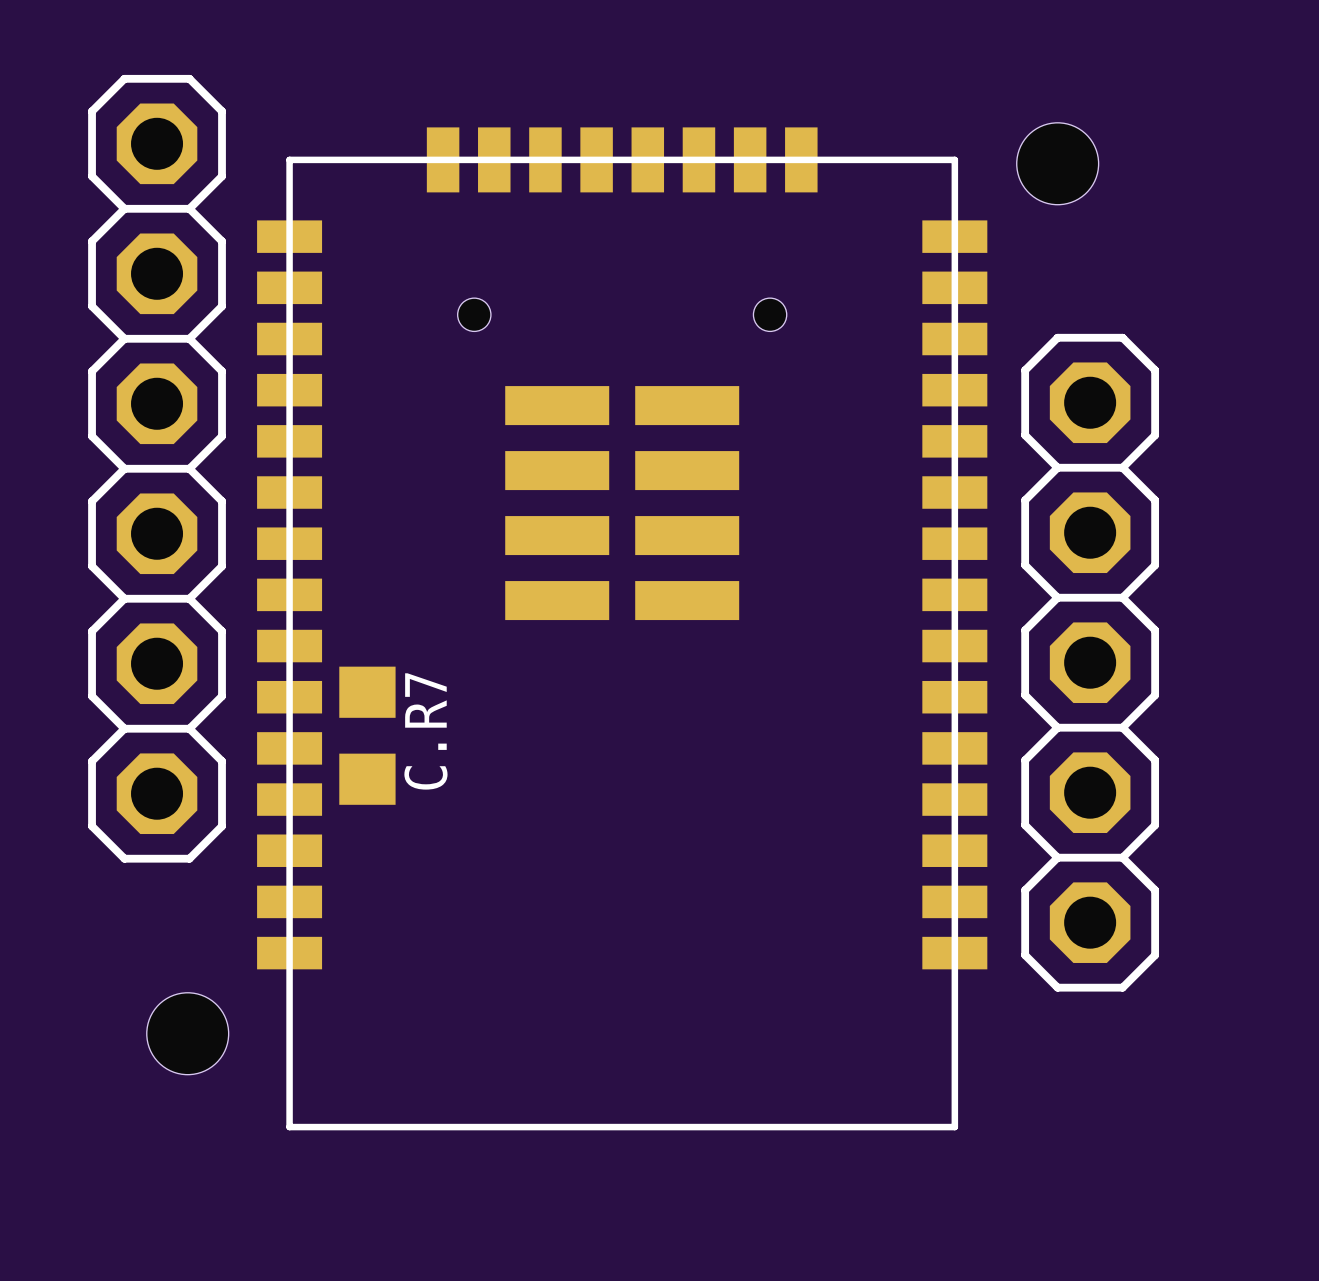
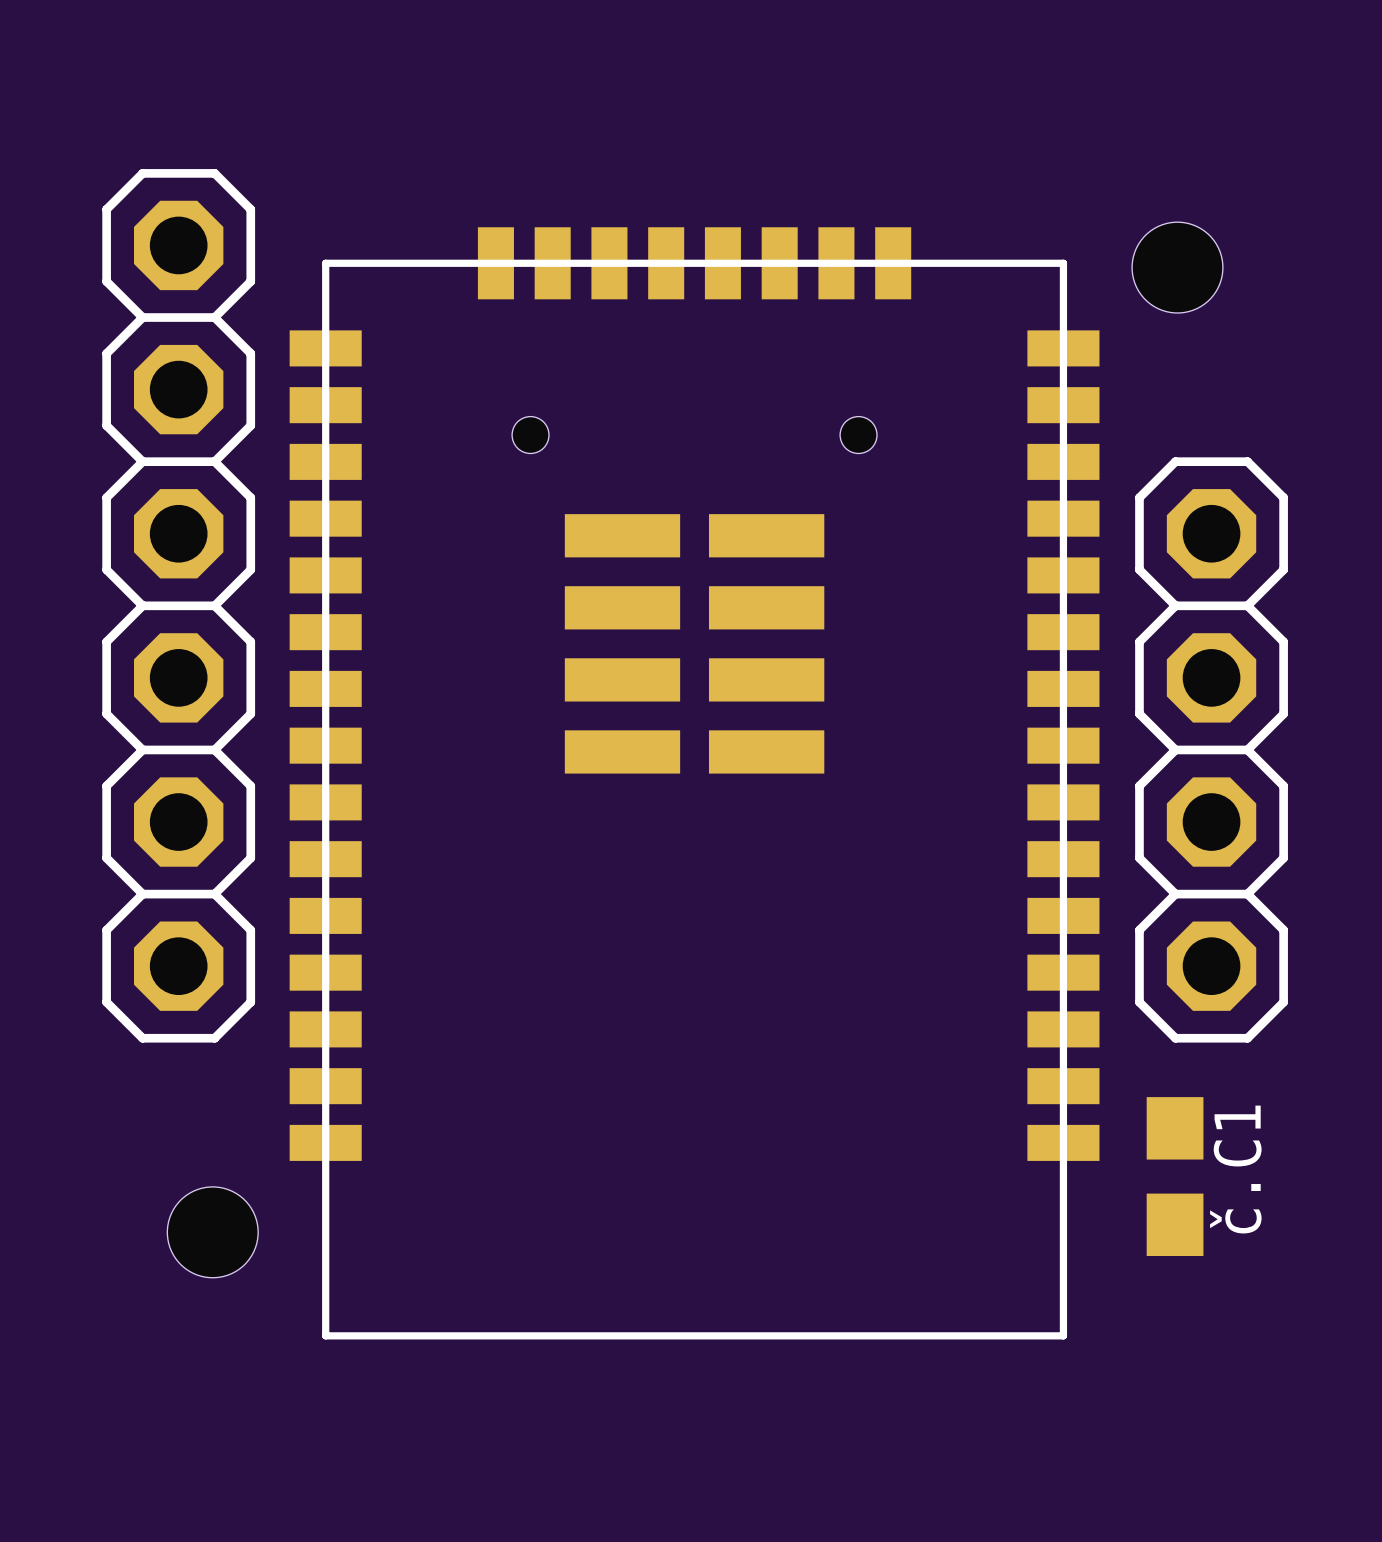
part: none -> (1211, 749)
part: (1090, 662) -> none
C.R7: (367, 735) -> none
č.C1: none -> (1175, 1176)

